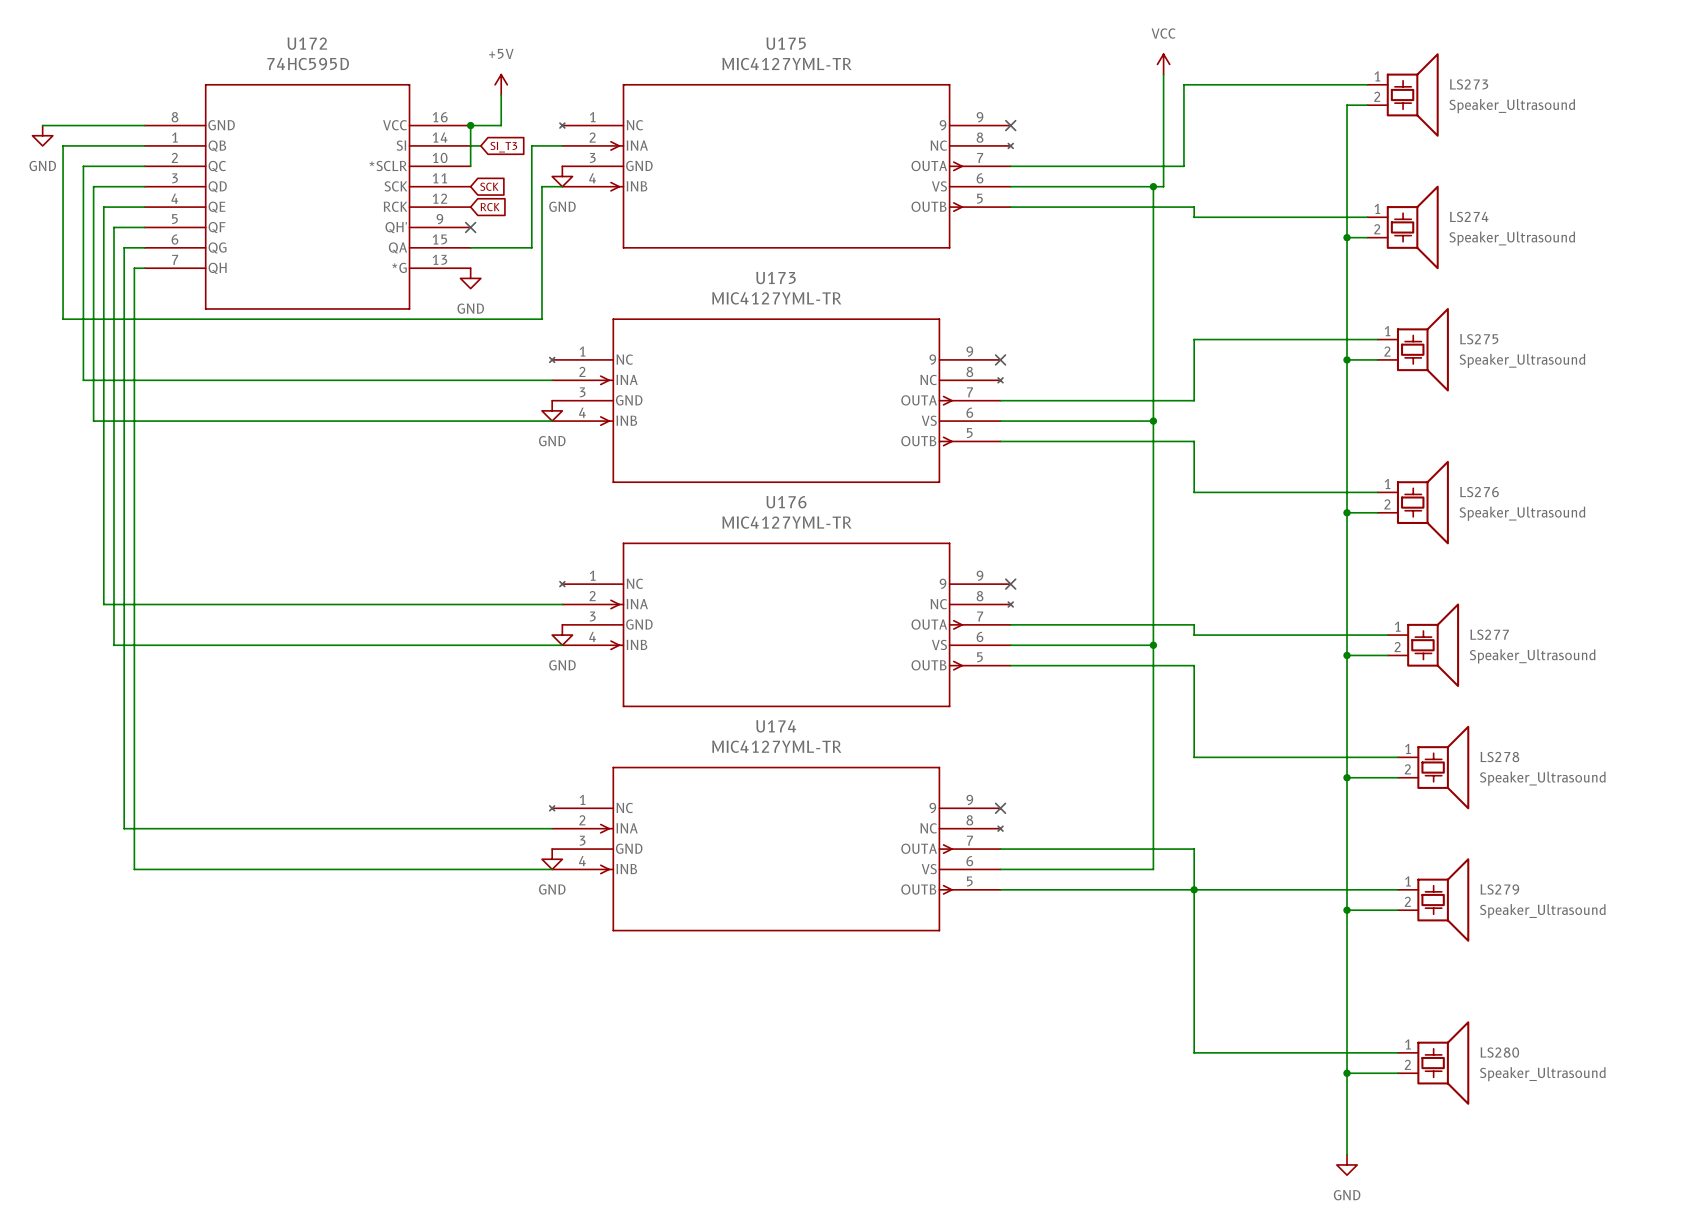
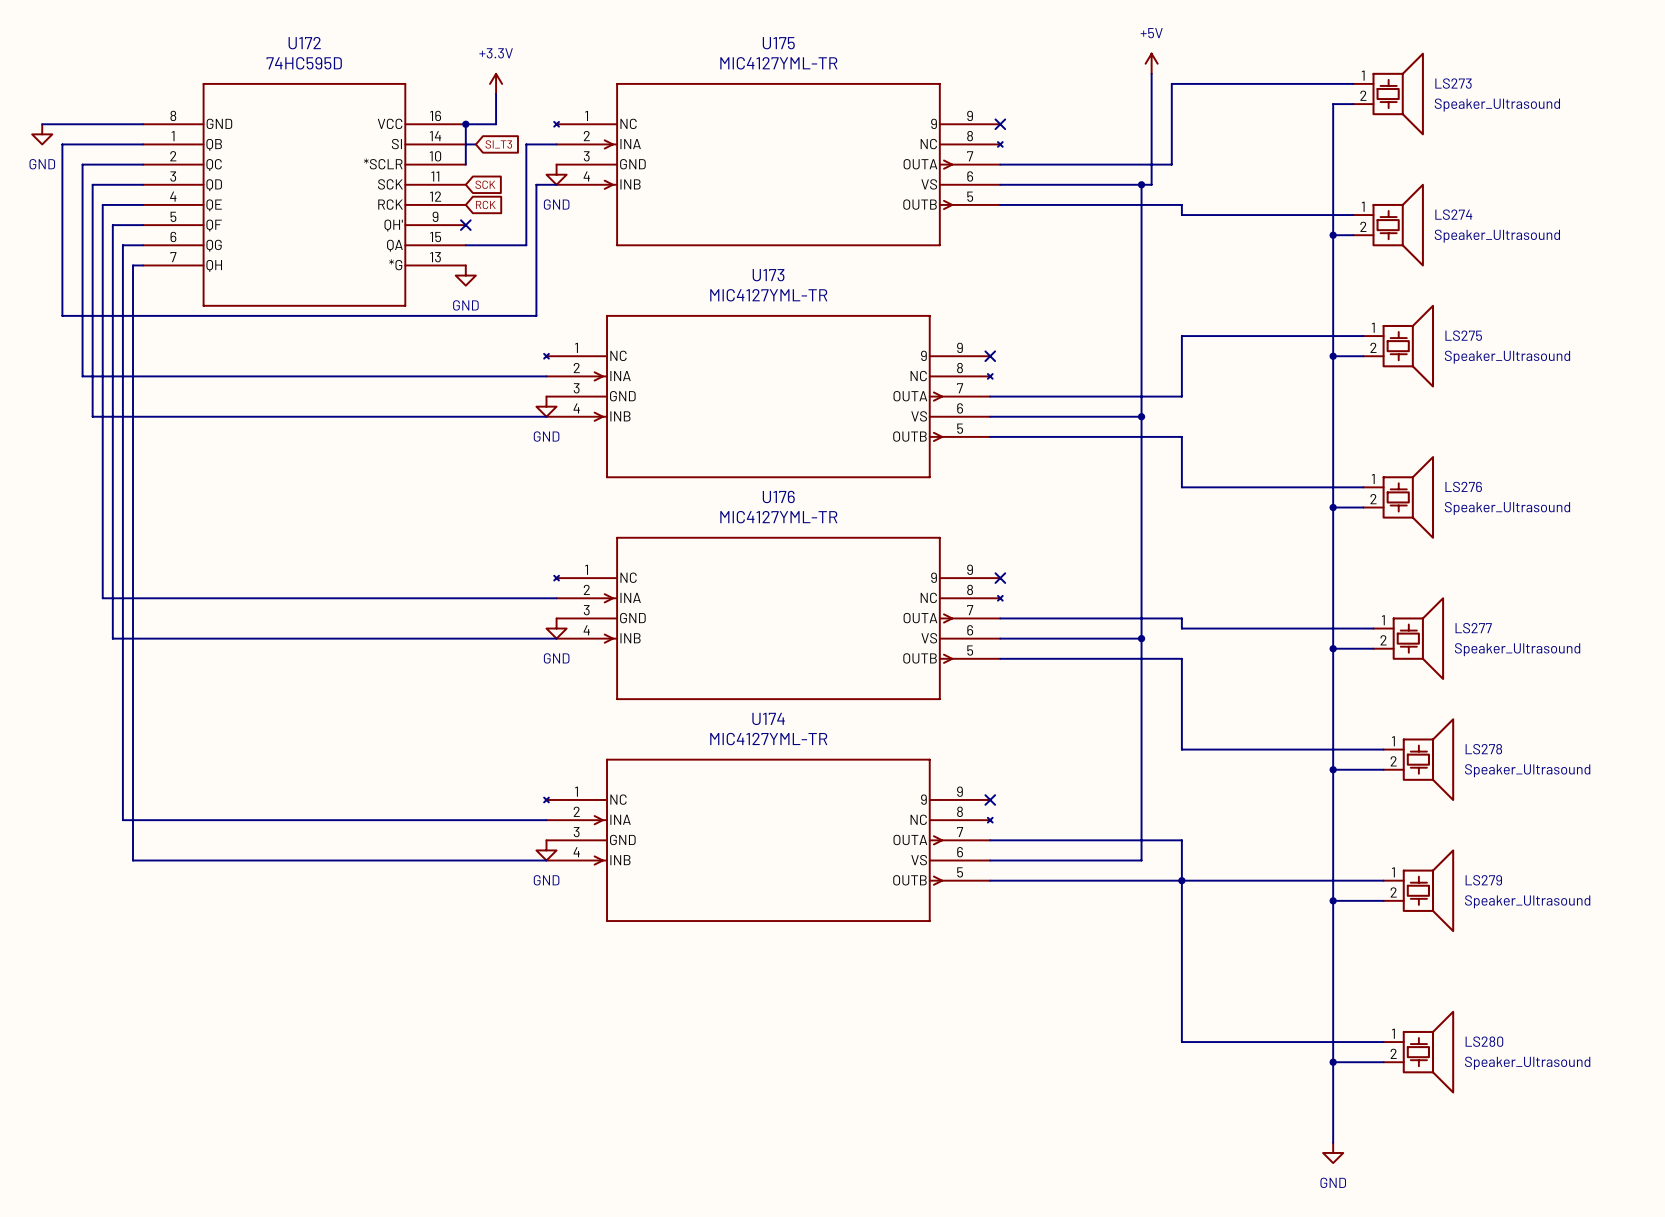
power symbol: VCC (1163, 64) -> +5V (1151, 63)
power symbol: +5V (501, 84) -> +3.3V (496, 83)

